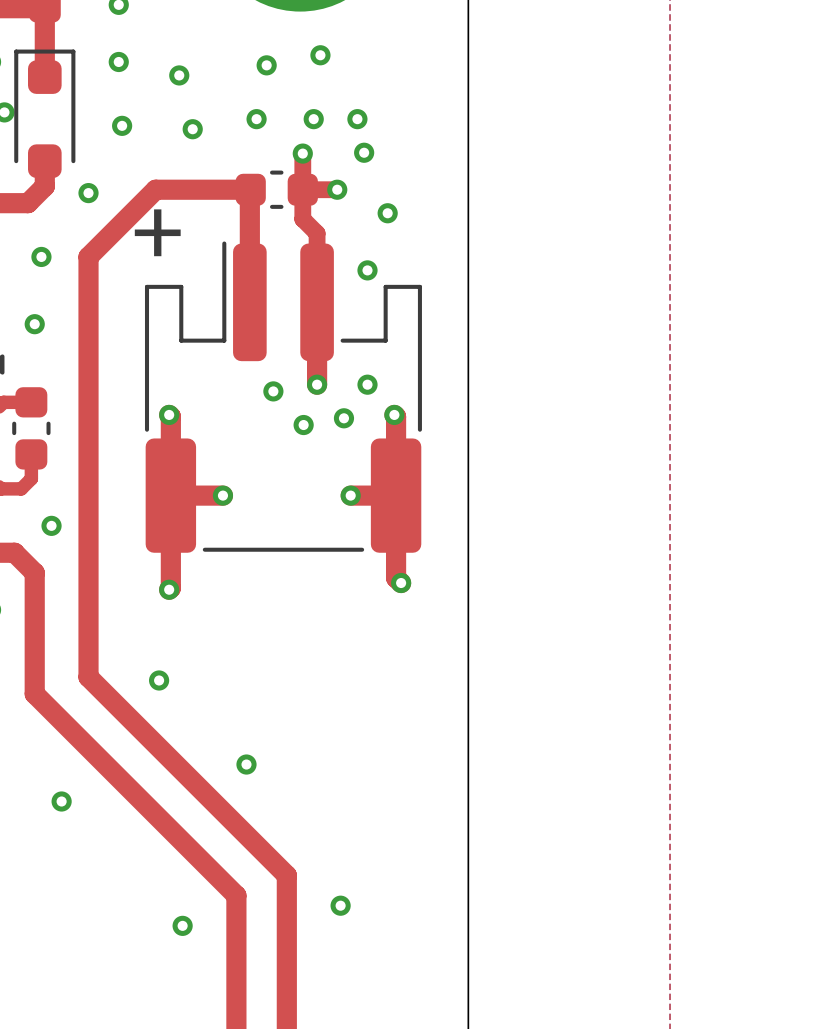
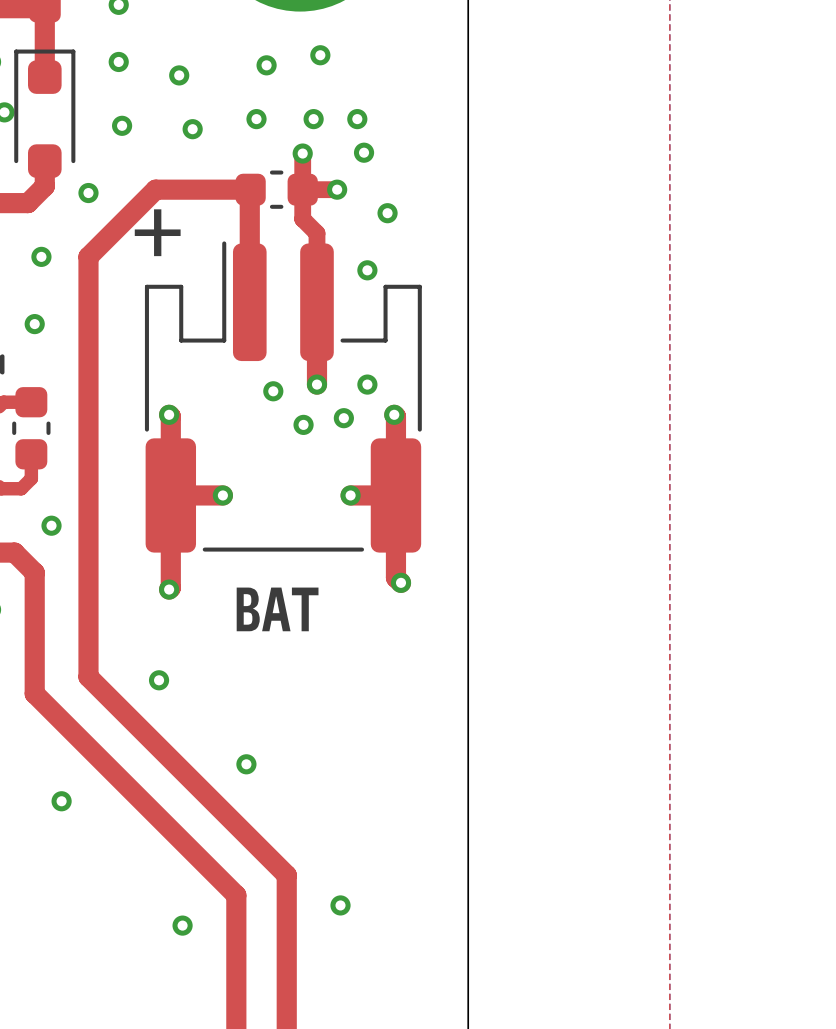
text: none -> BAT (277, 609)

